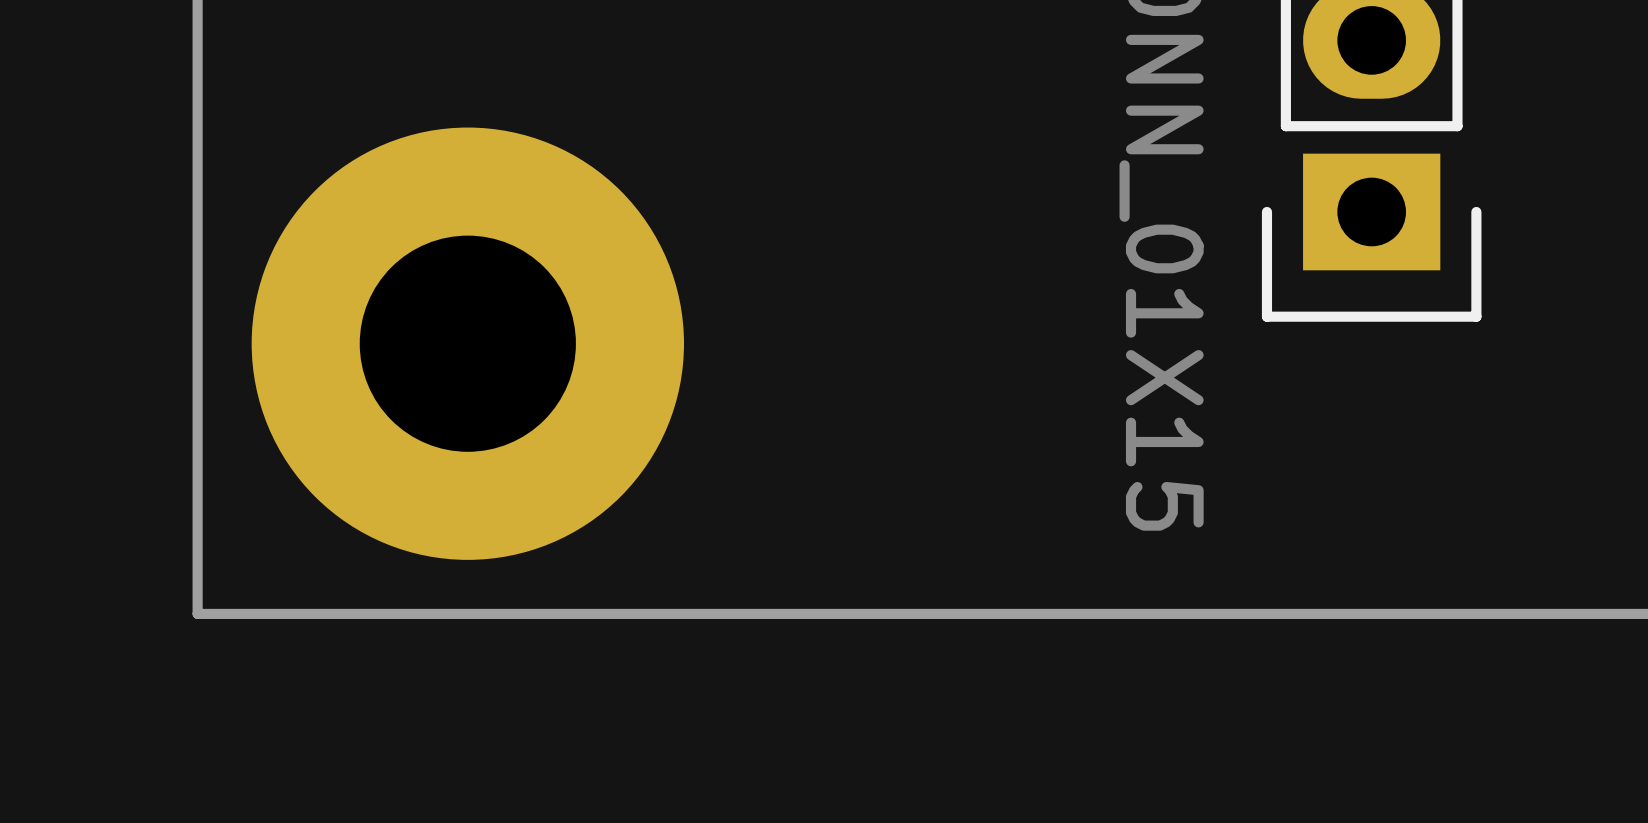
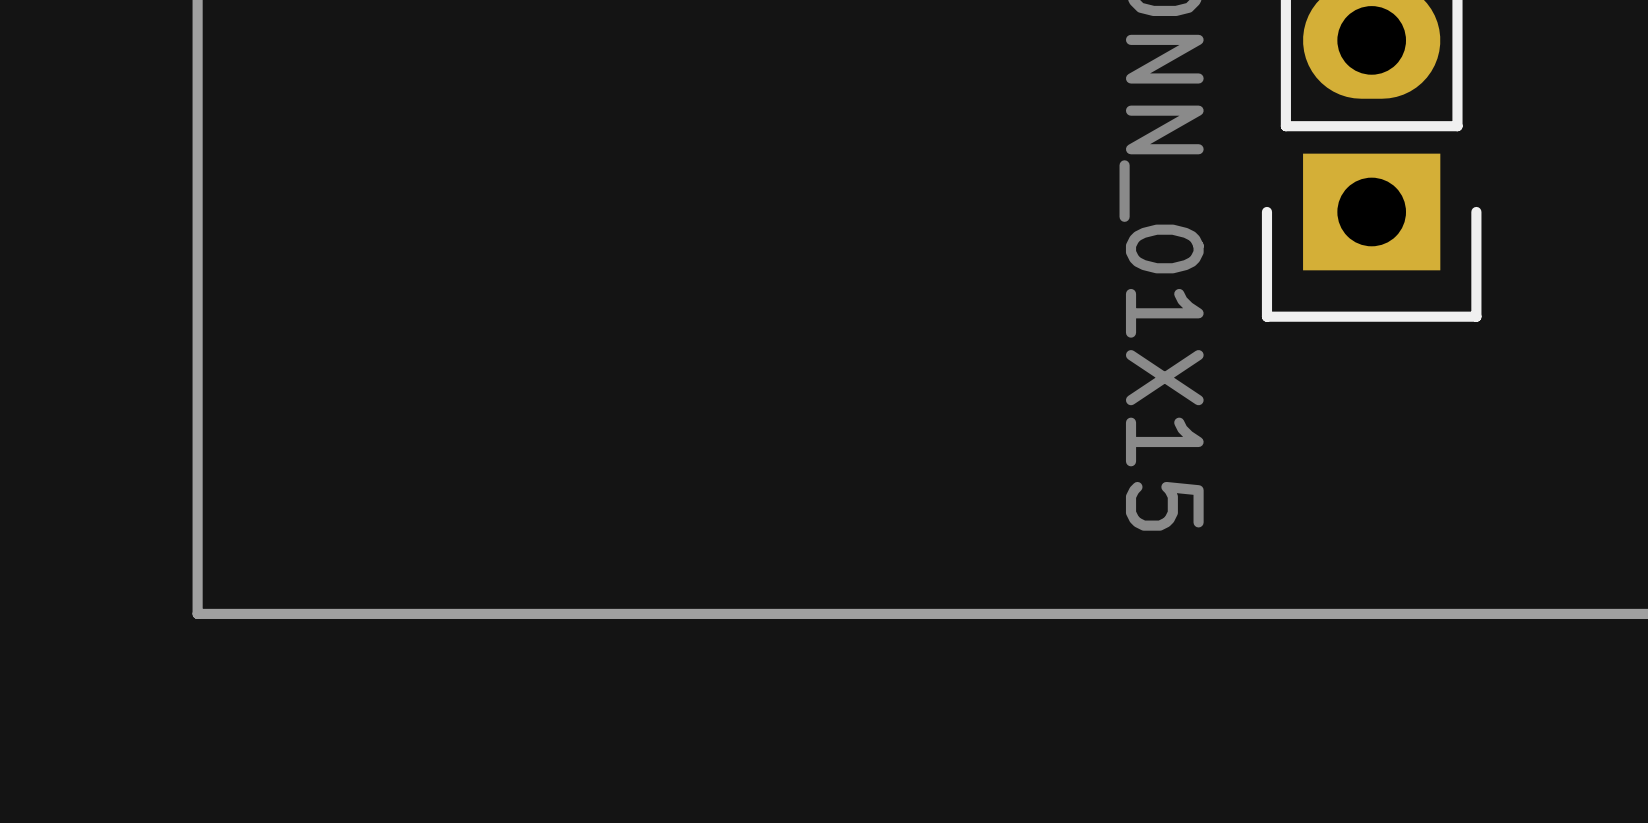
part: (467, 343) -> none

